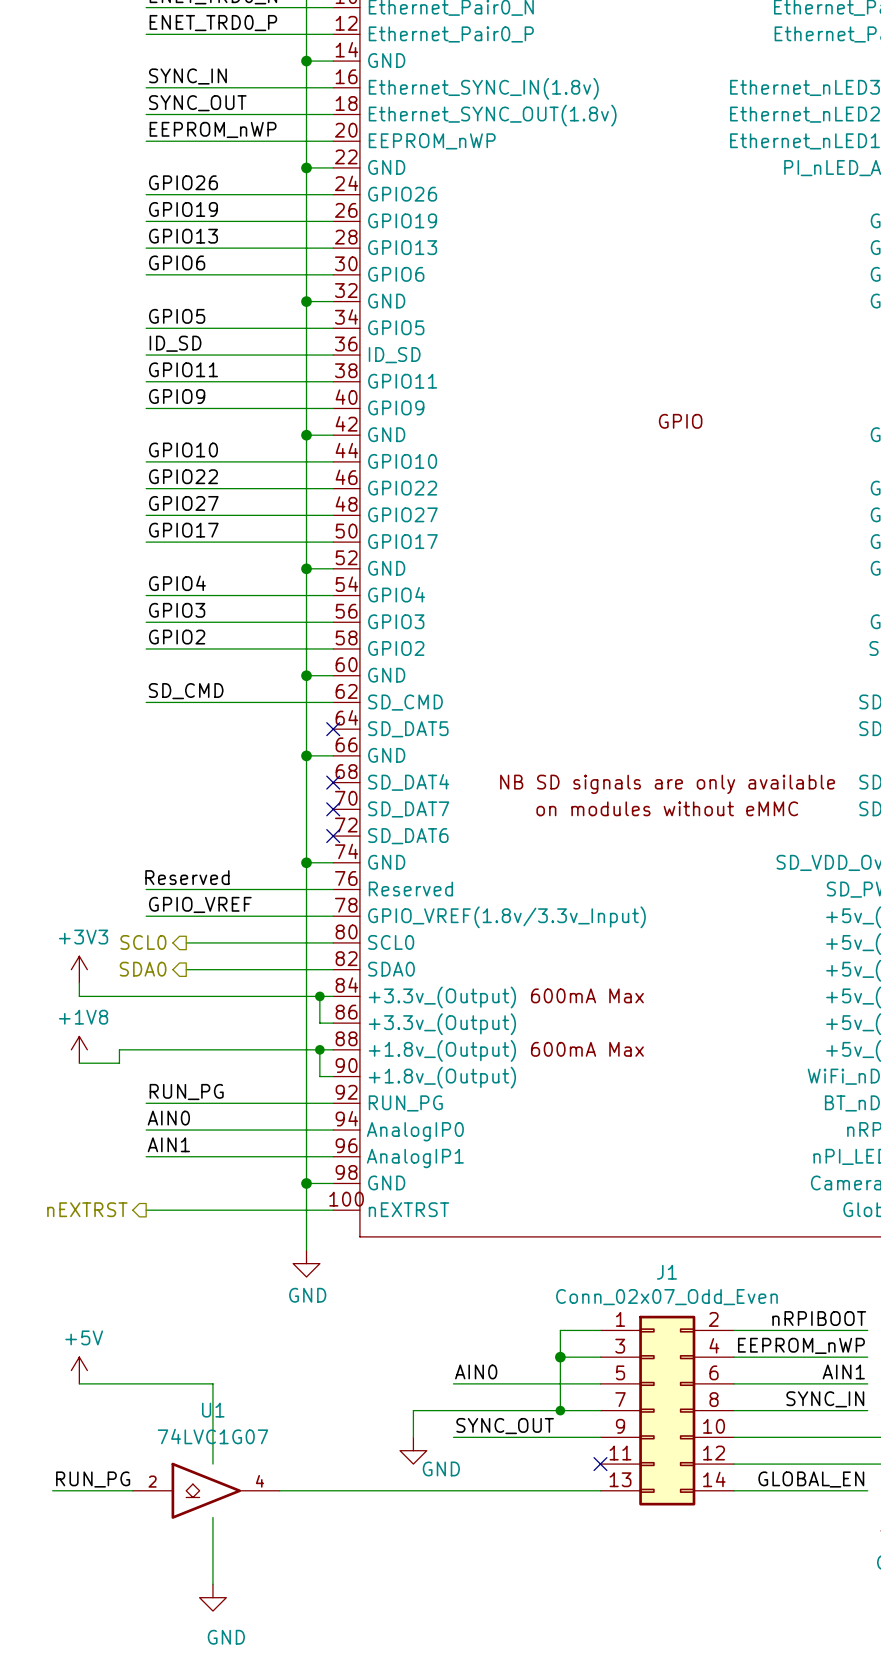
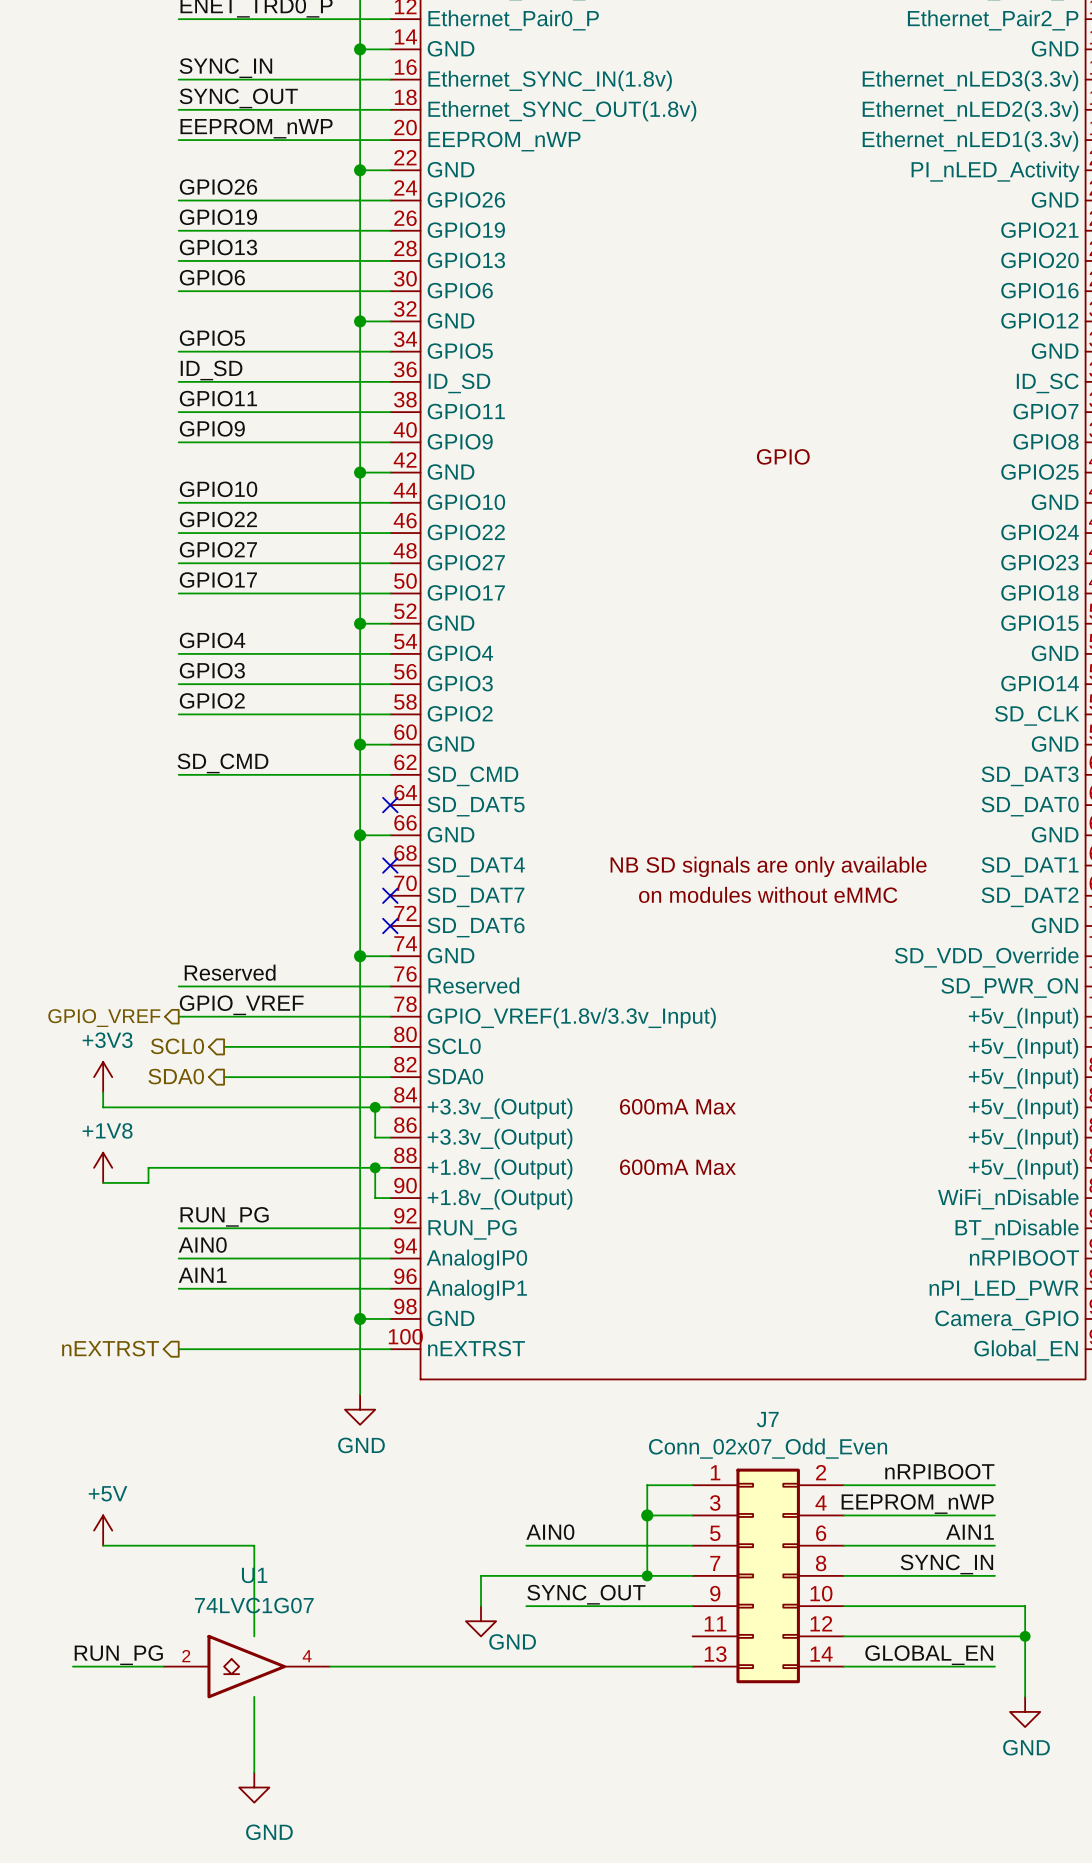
hierarchical label: none -> GPIO_VREF (104, 1018)
J1 name: J1 (666, 1272) -> J7 (767, 1419)
no-connect mark: (600, 1464) -> none

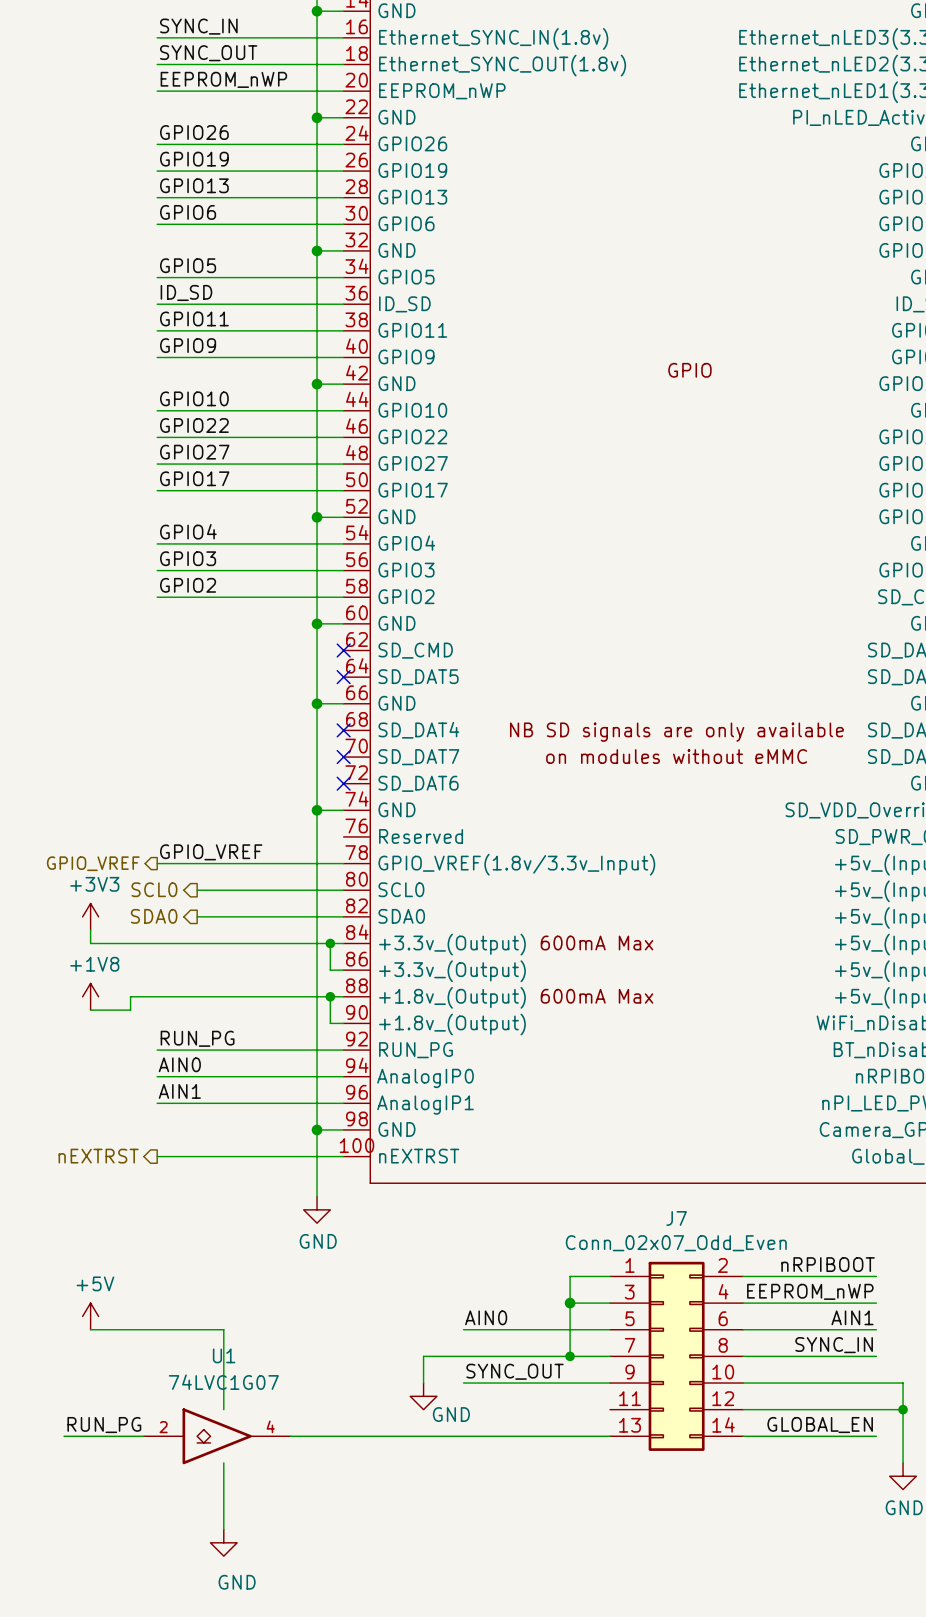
label: SD_CMD (223, 763) -> none
wire: (178, 774) (390, 774) -> none
no-connect mark: none -> (343, 650)
label: Reserved (230, 972) -> none
wire: (178, 986) (390, 986) -> none

